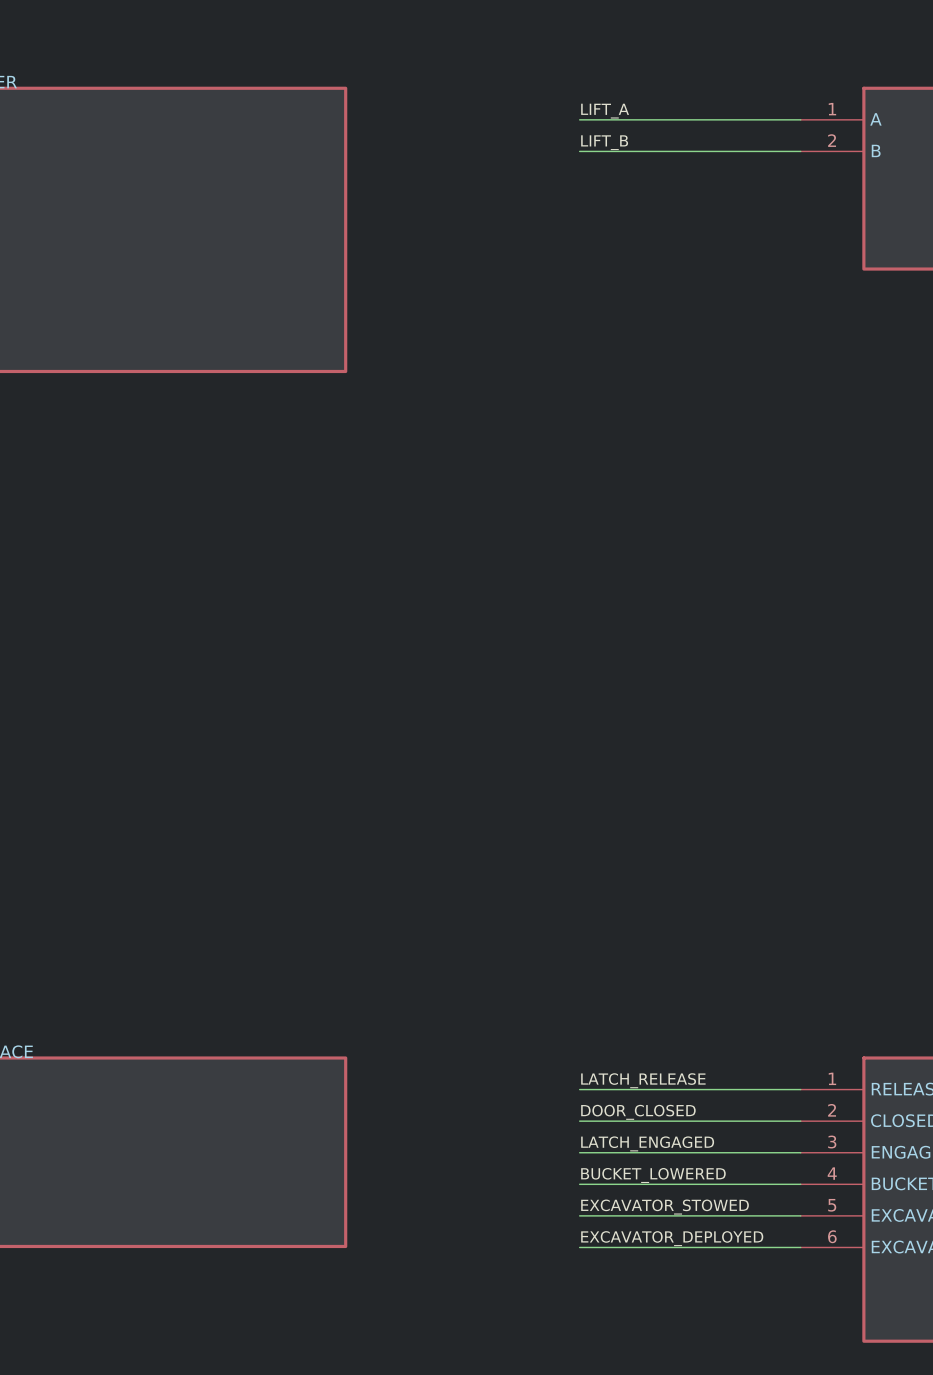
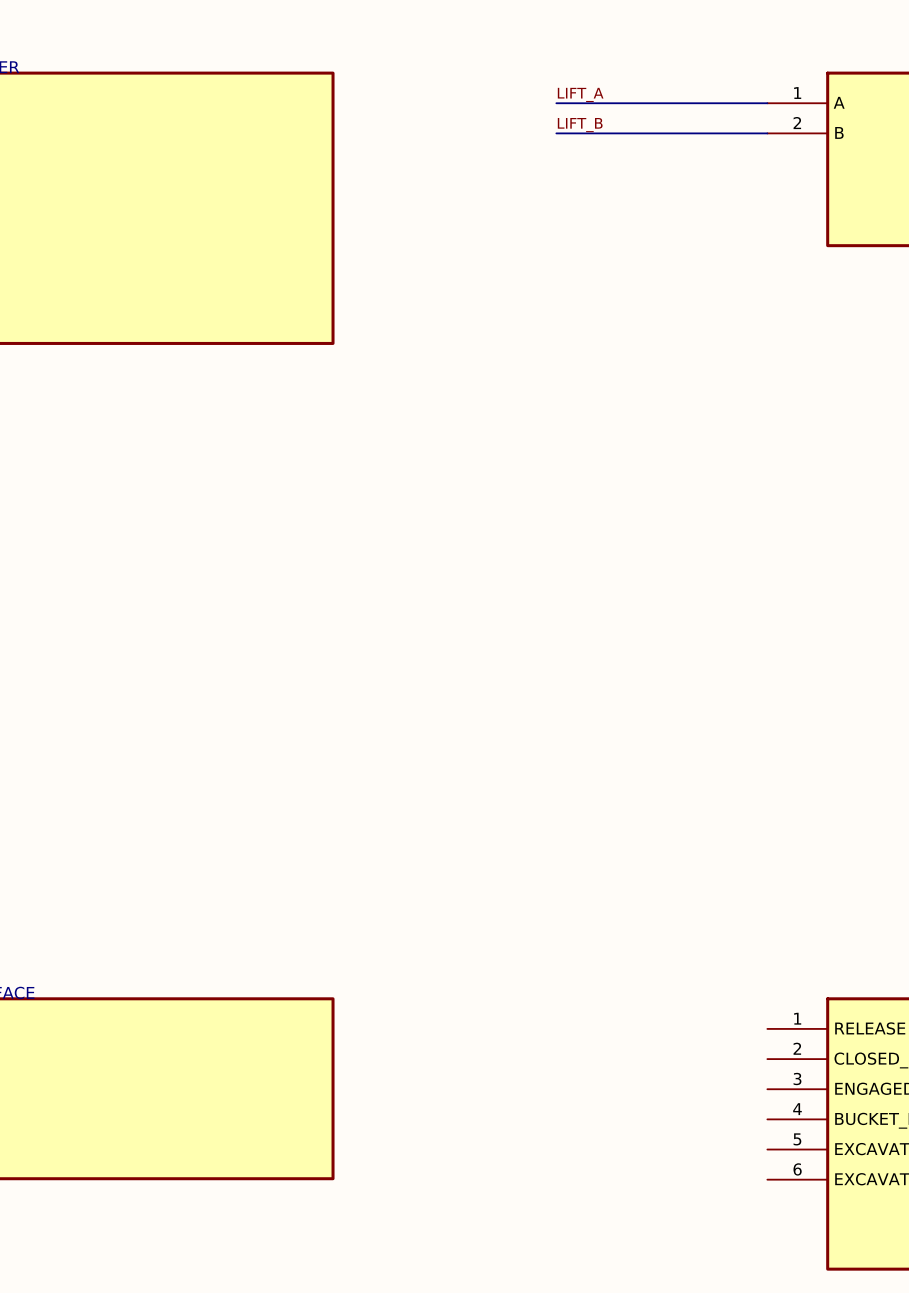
label: LATCH_RELEASE (643, 1080) -> none
wire: (579, 1089) (800, 1089) -> none
label: DOOR_CLOSED (638, 1112) -> none
wire: (579, 1121) (800, 1121) -> none
label: LATCH_ENGAGED (647, 1143) -> none
wire: (579, 1152) (800, 1152) -> none
label: BUCKET_LOWERED (653, 1175) -> none
wire: (579, 1184) (800, 1184) -> none
label: EXCAVATOR_STOWED (665, 1207) -> none
wire: (579, 1215) (800, 1215) -> none
label: EXCAVATOR_DEPLOYED (672, 1238) -> none
wire: (579, 1247) (800, 1247) -> none

